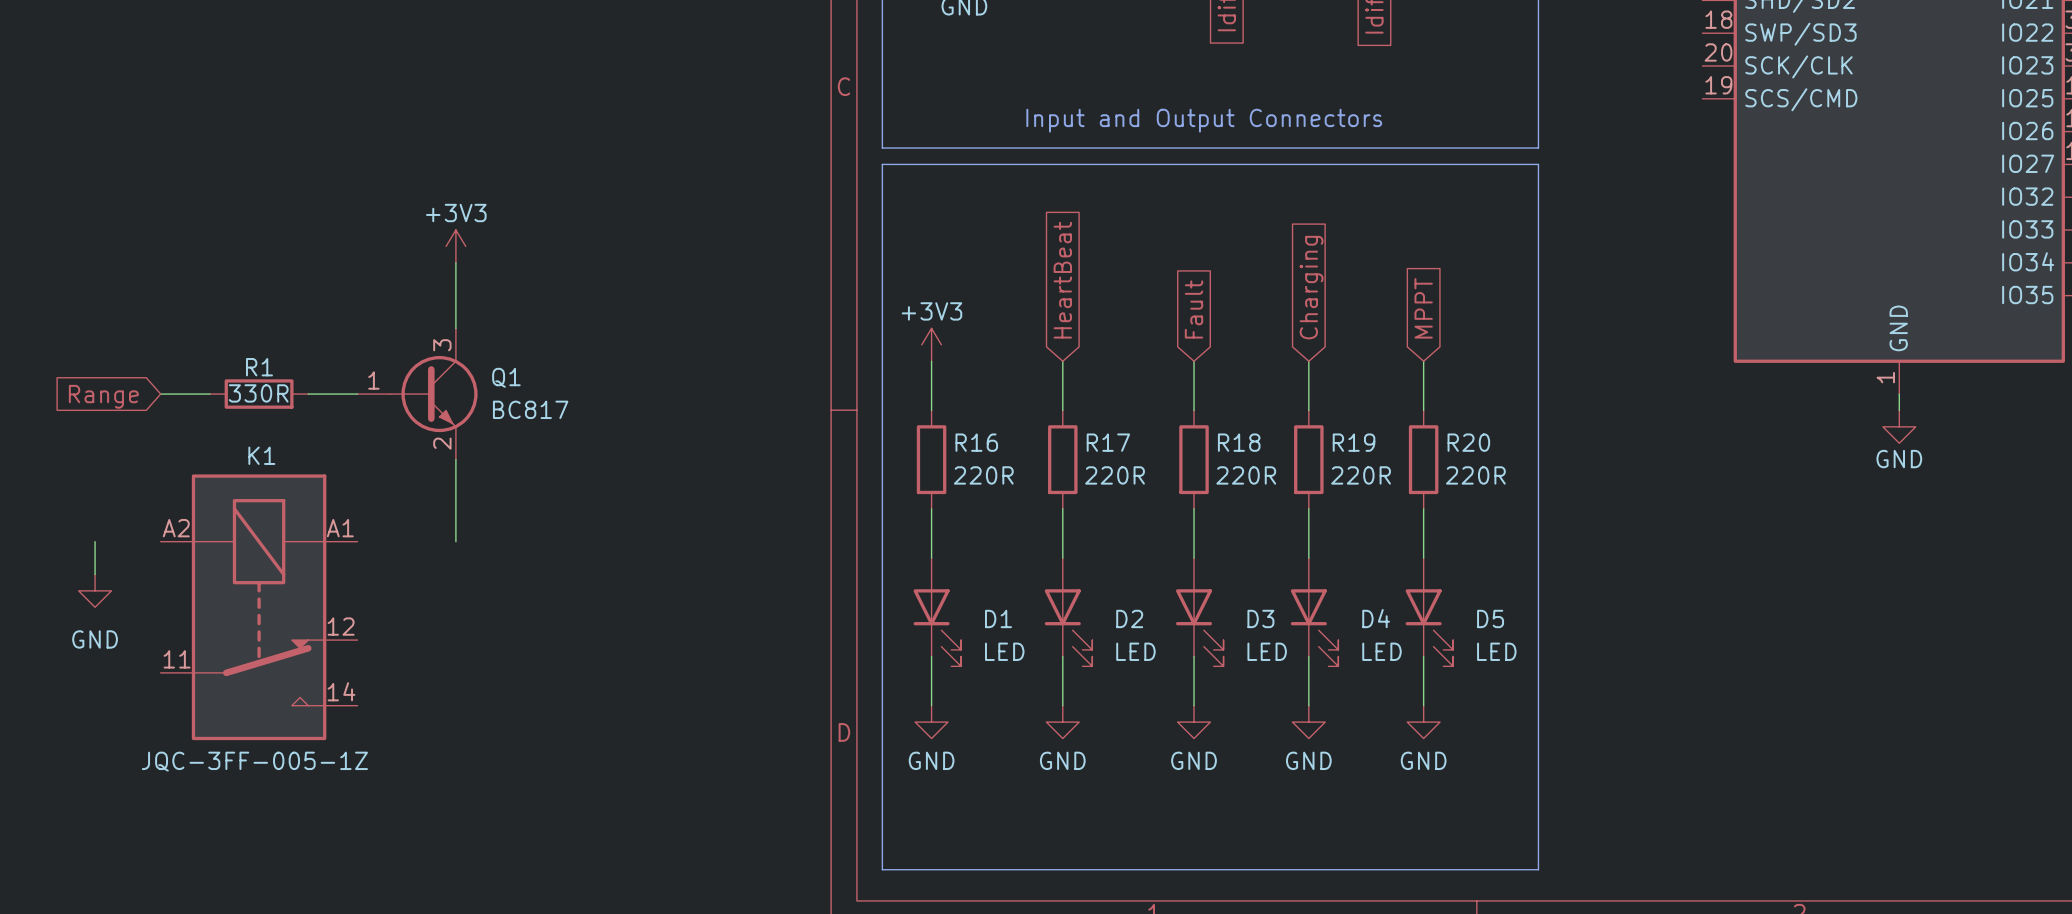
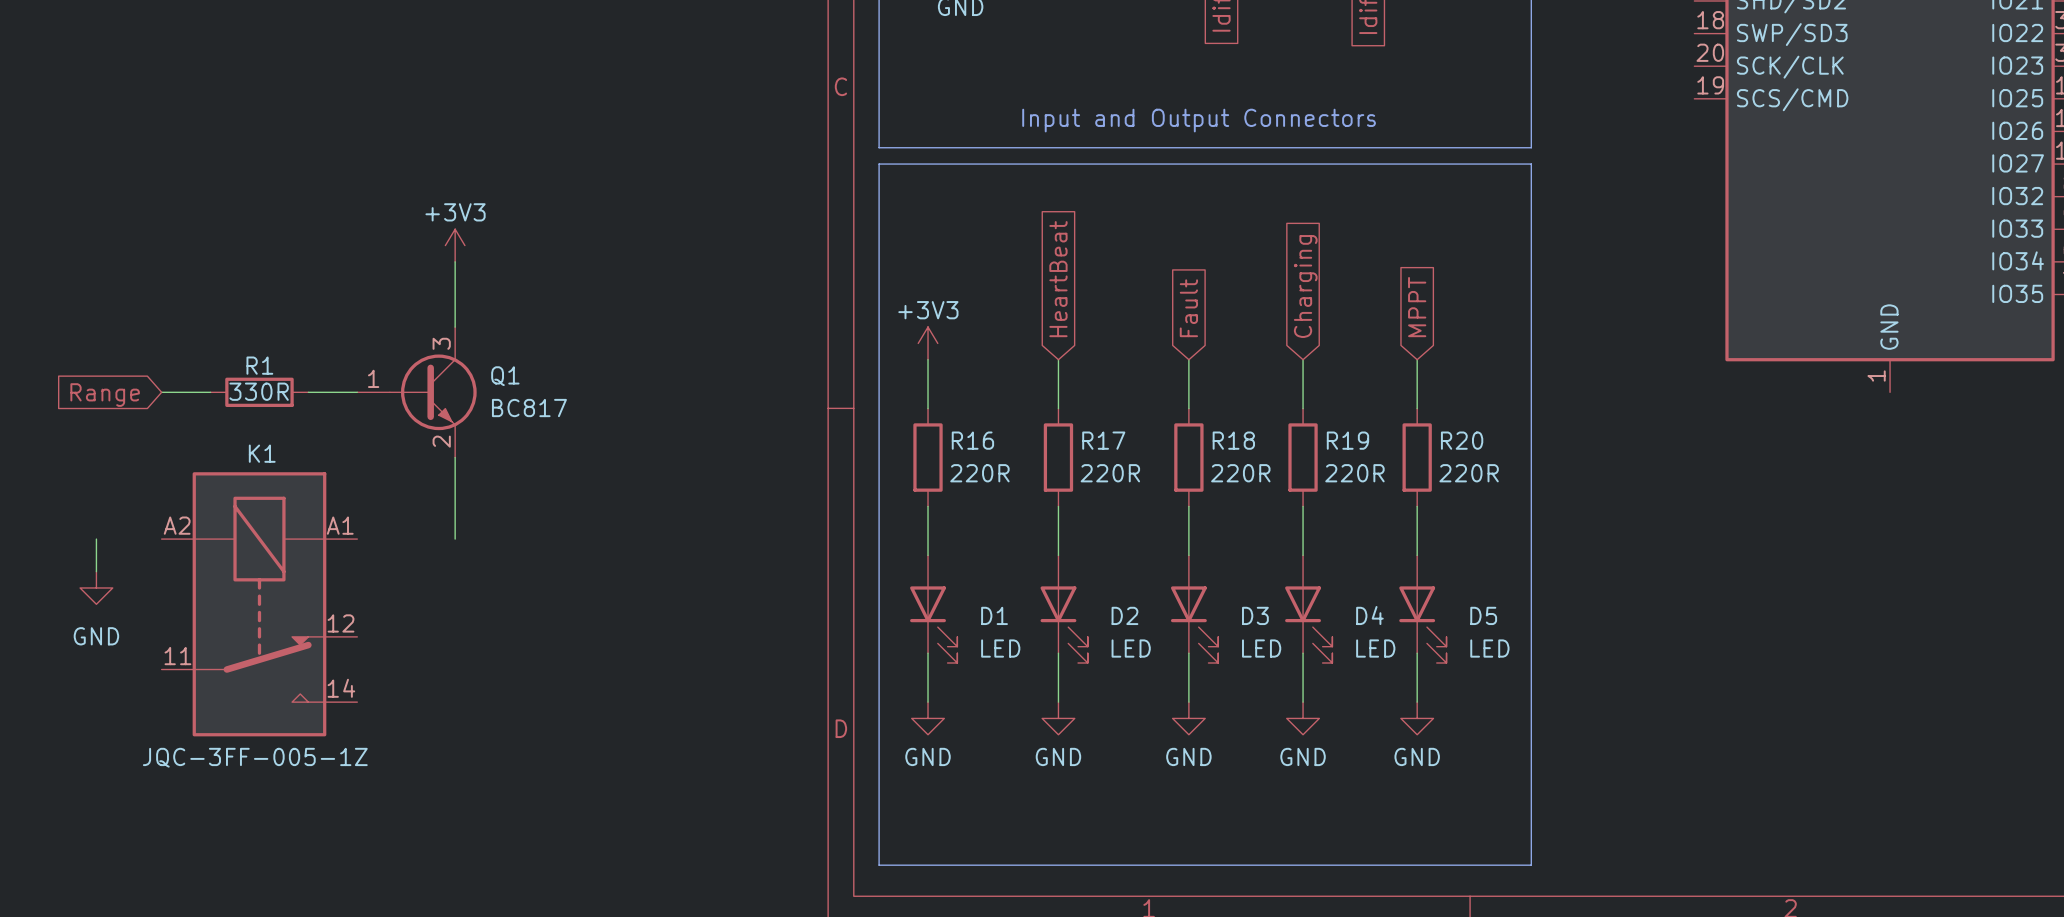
wire: (1899, 394) (1899, 410) -> none
power symbol: GND (1899, 426) -> none

